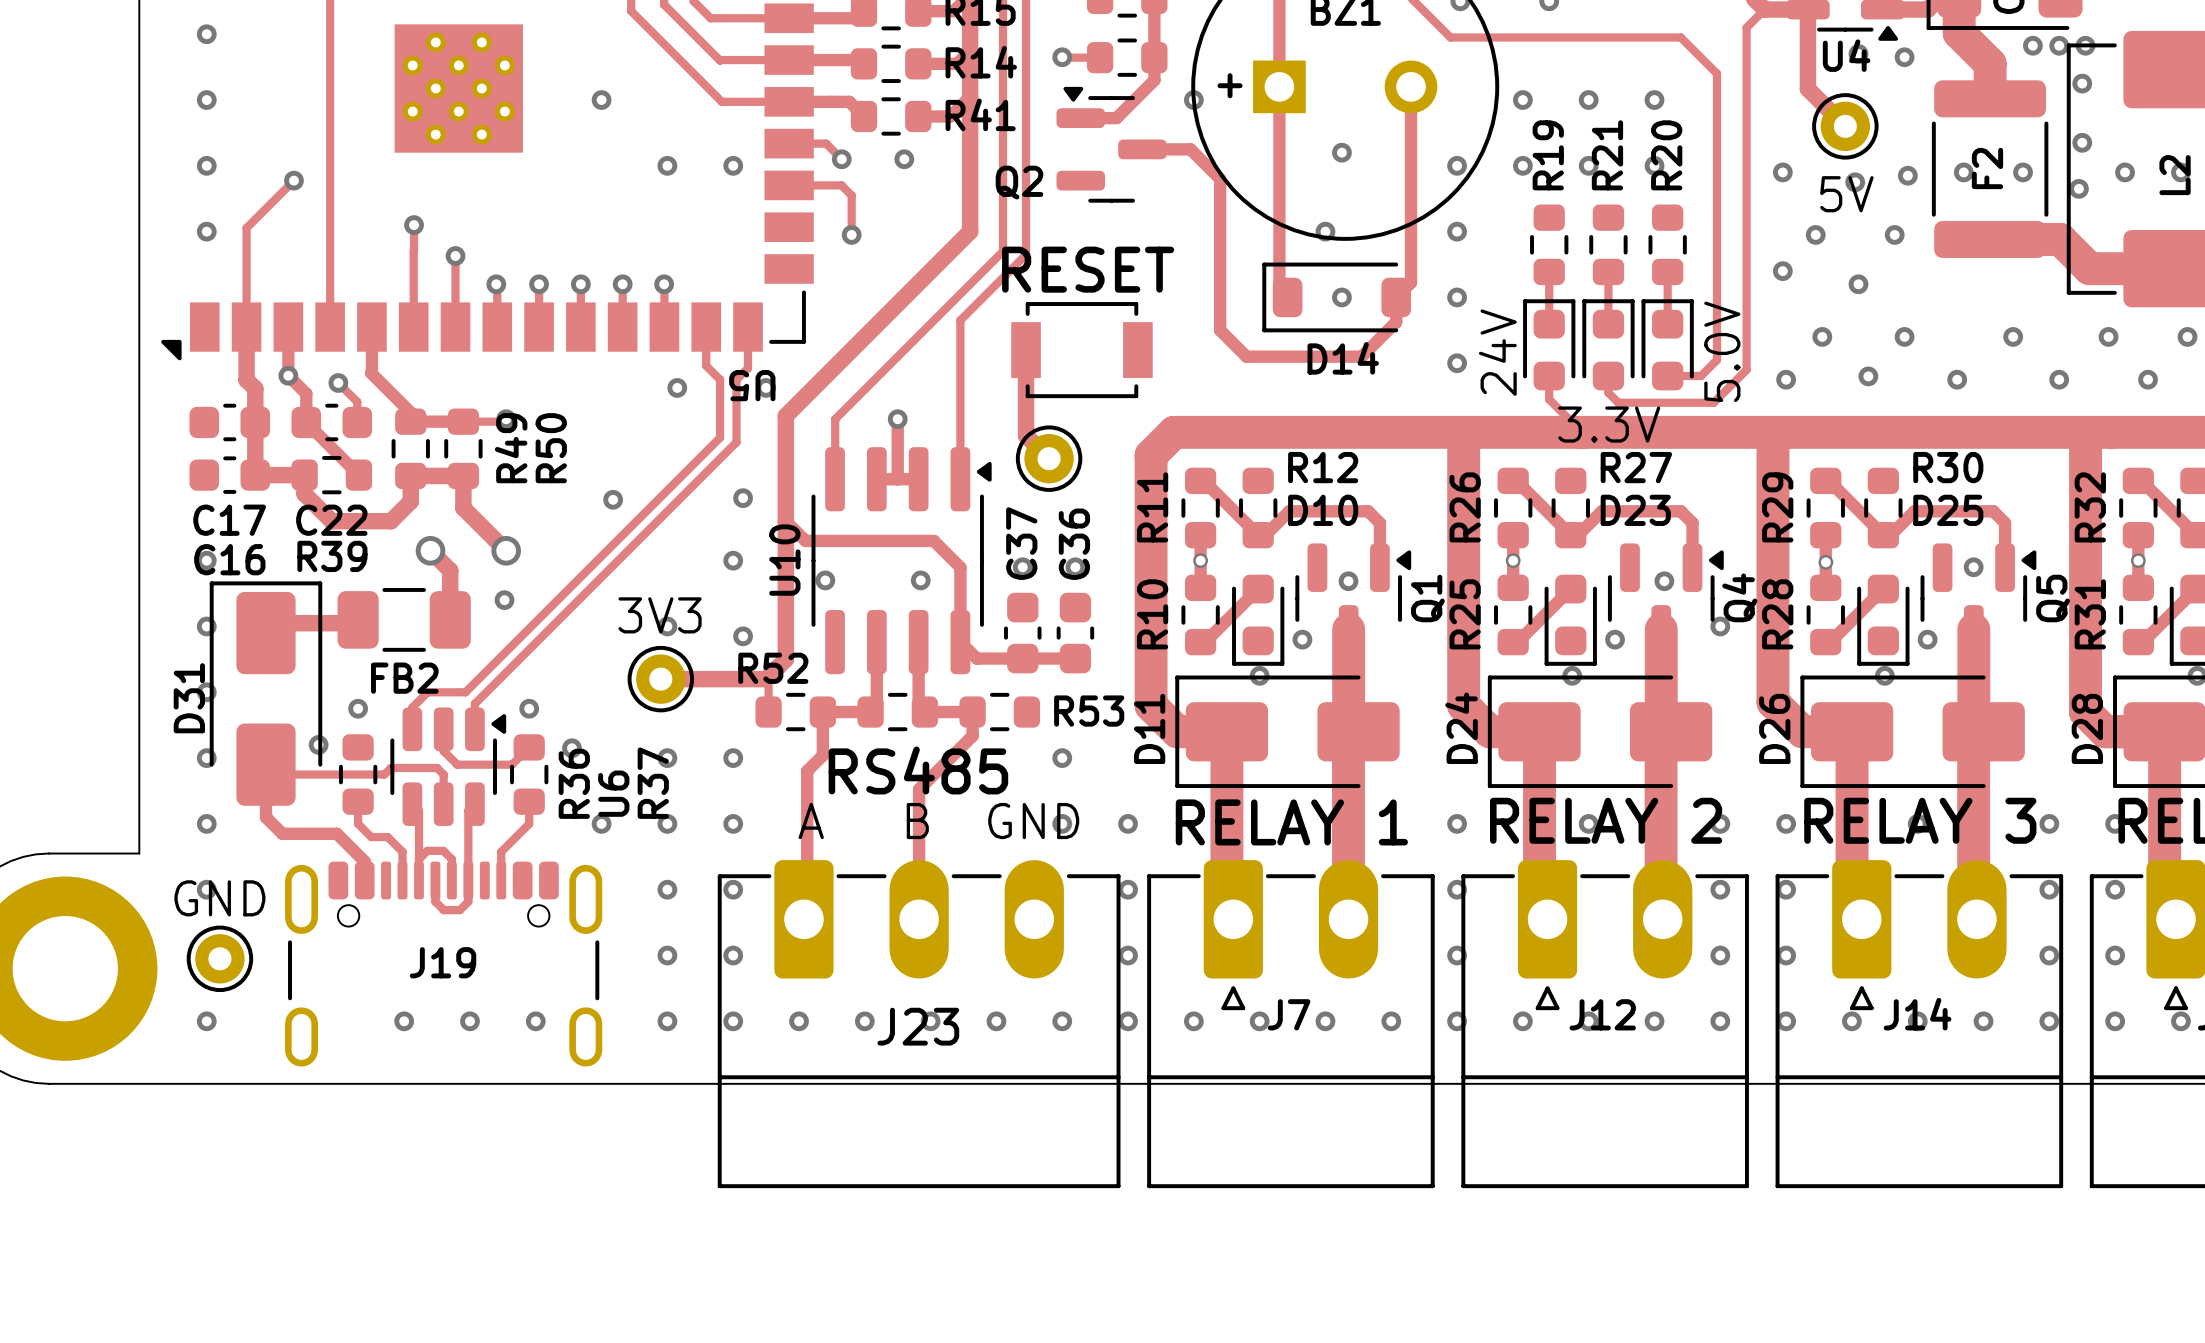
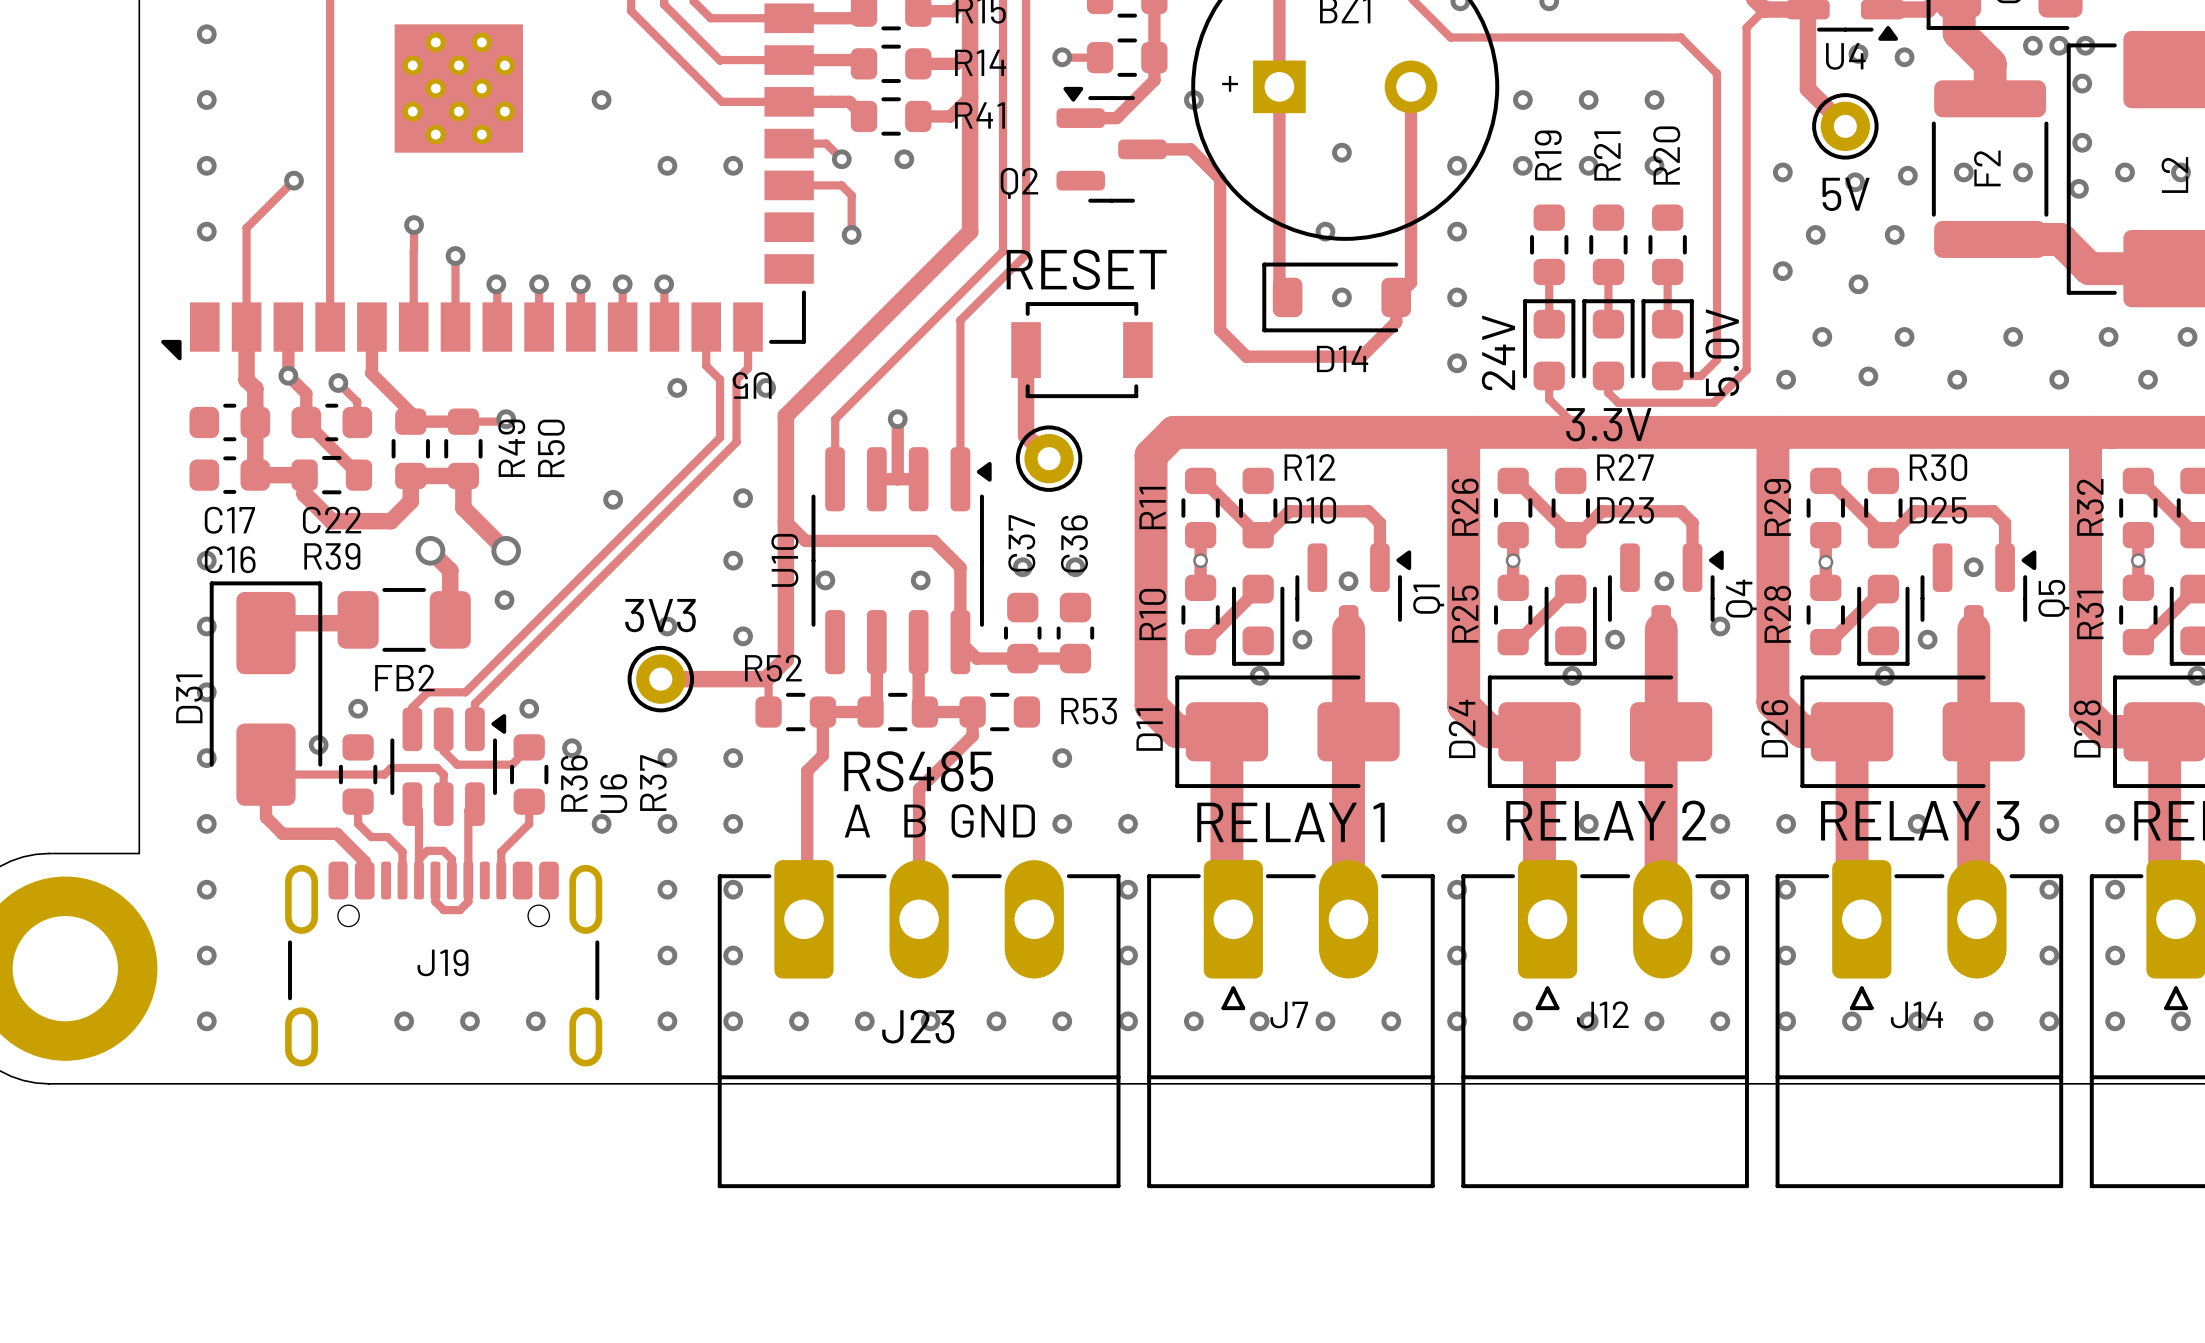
text: GND (219, 898) -> none
via: none -> (206, 955)
part: (219, 958) -> none

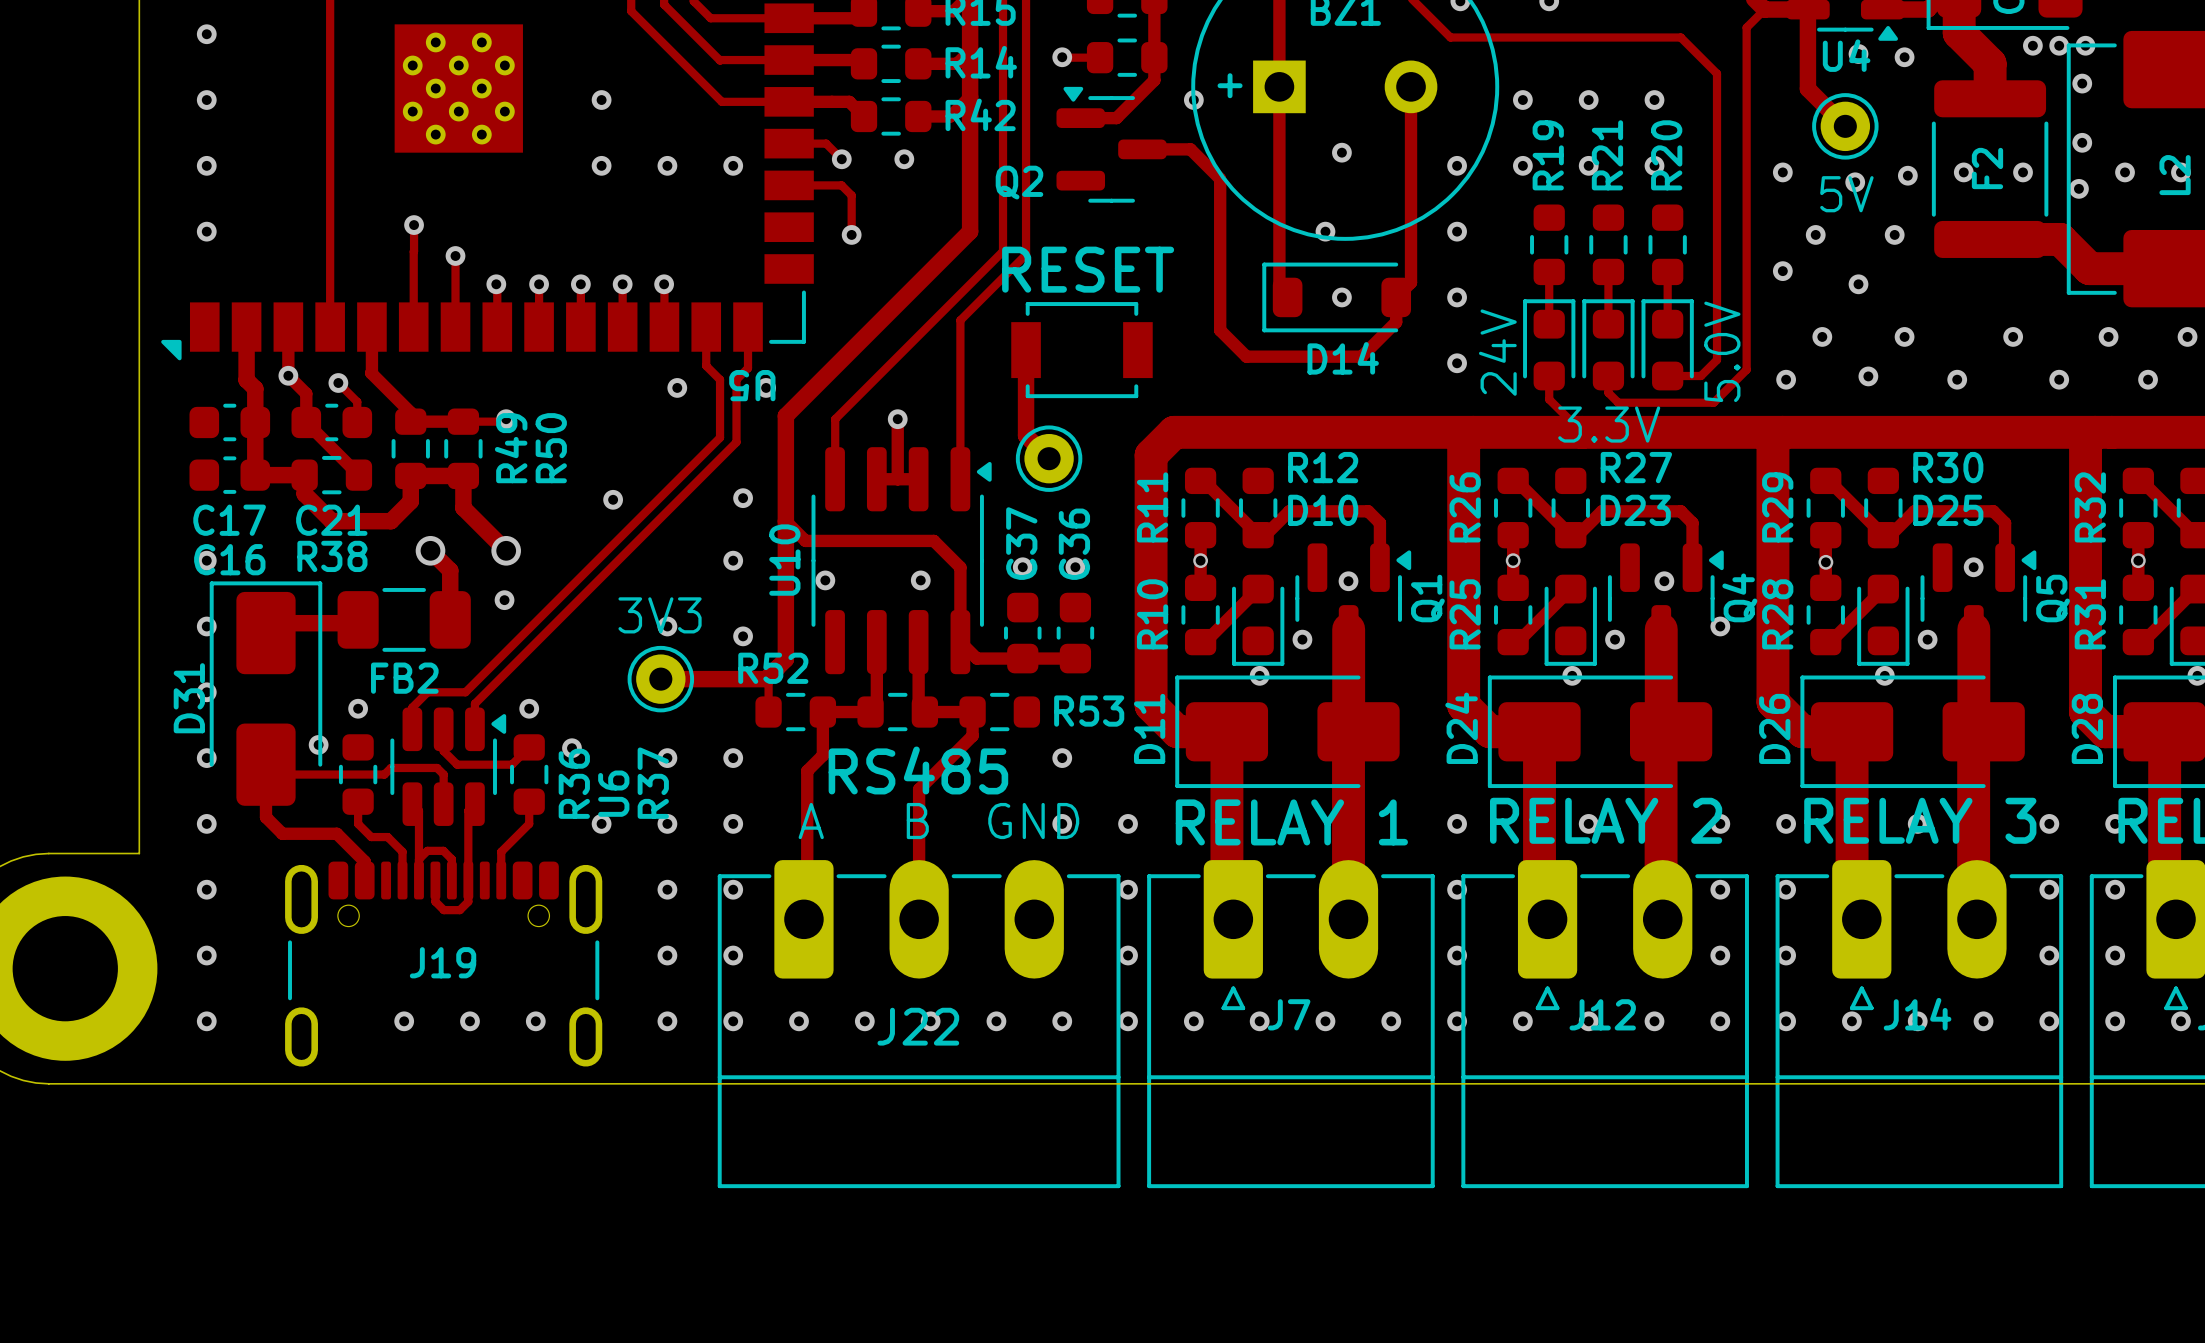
R41 name: R41 (980, 115) -> R42 (980, 114)
via: none -> (601, 165)
track: (293, 180) (246, 228) (246, 327) -> none
via: (293, 180) -> none
C22 name: C22 (332, 520) -> C21 (331, 520)
R39 name: R39 (332, 556) -> R38 (332, 556)
J23 name: J23 (918, 1026) -> J22 (918, 1026)

